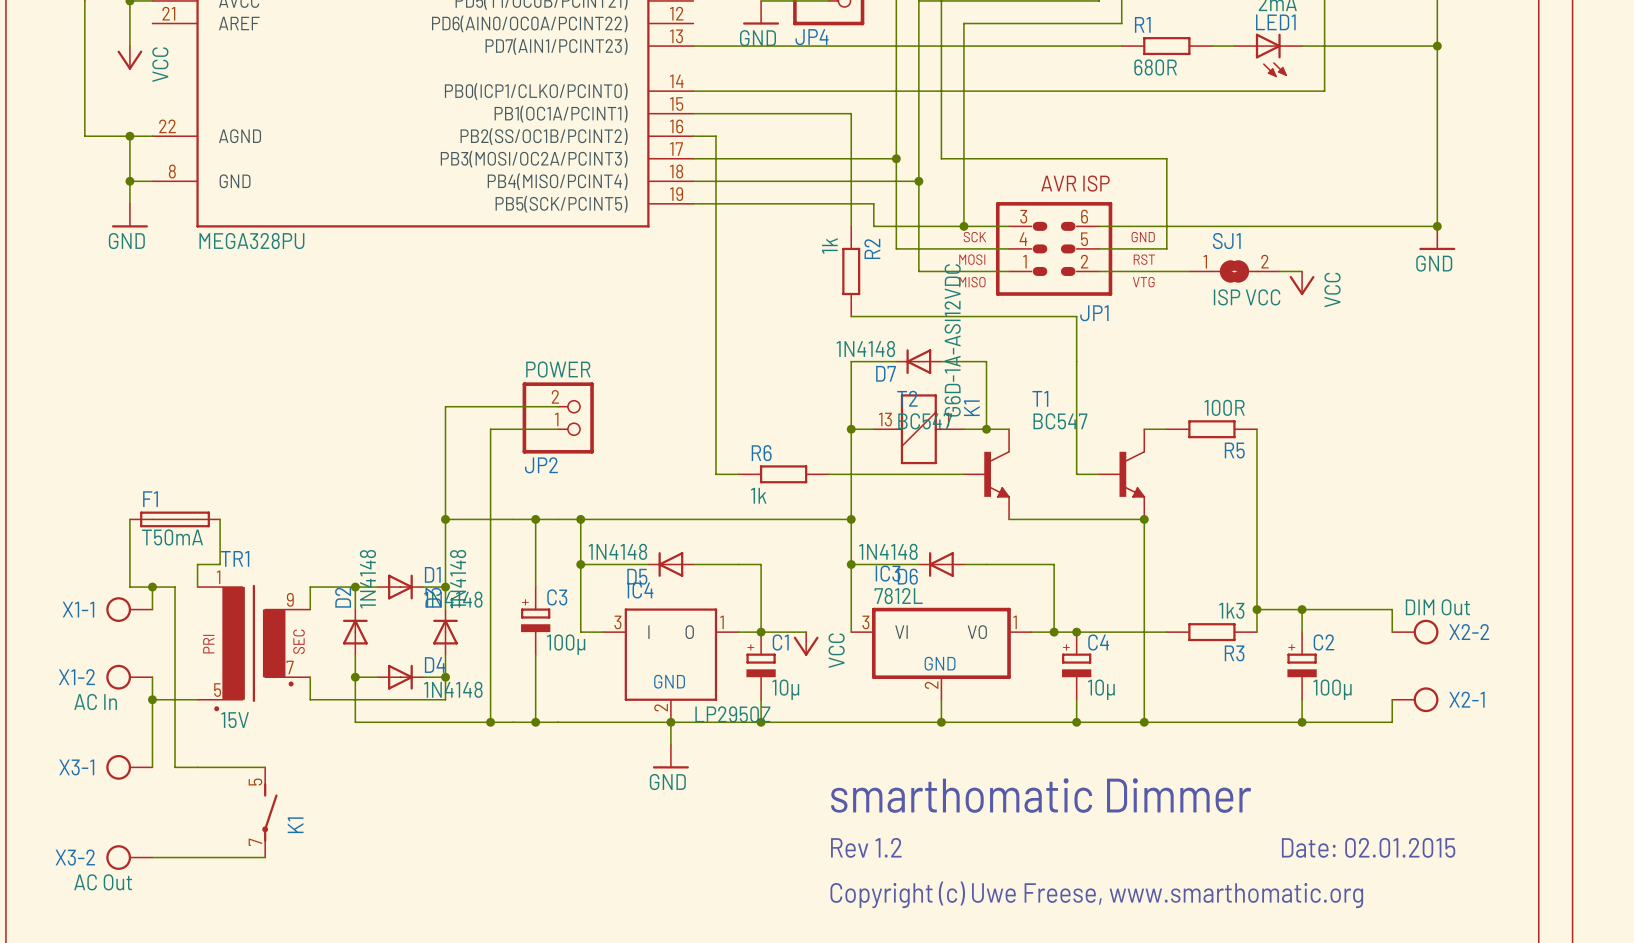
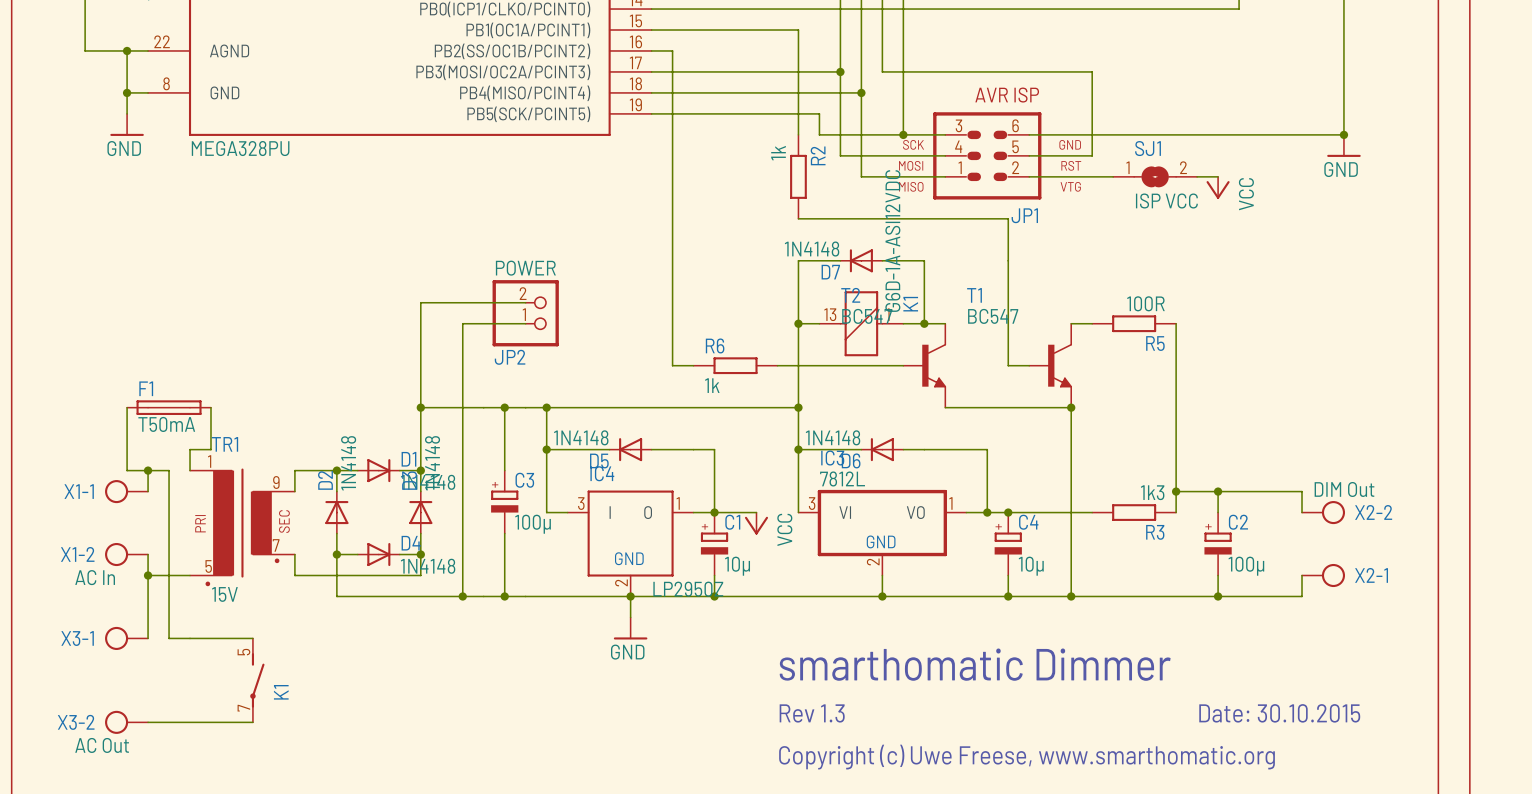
text: Rev 1.2 (866, 847) -> Rev 1.3 (812, 713)
text: Date: 02.01.2015 (1368, 847) -> Date: 30.10.2015 (1279, 713)

